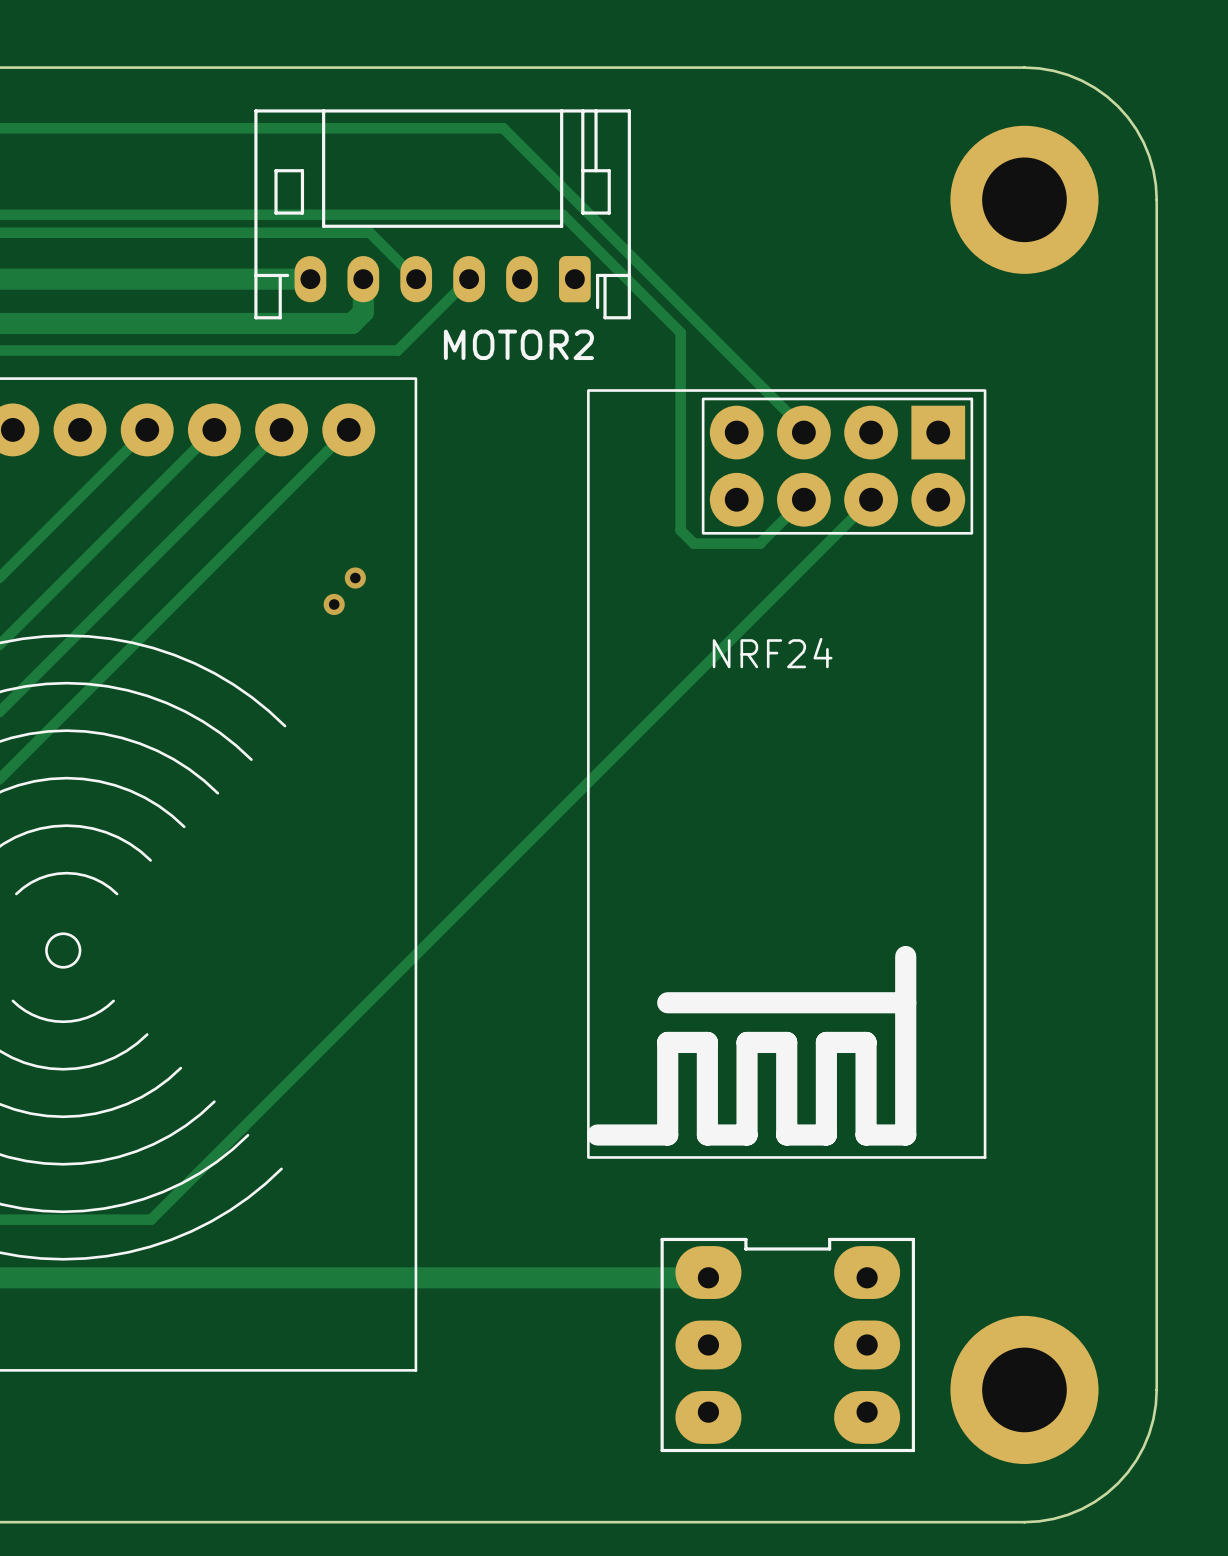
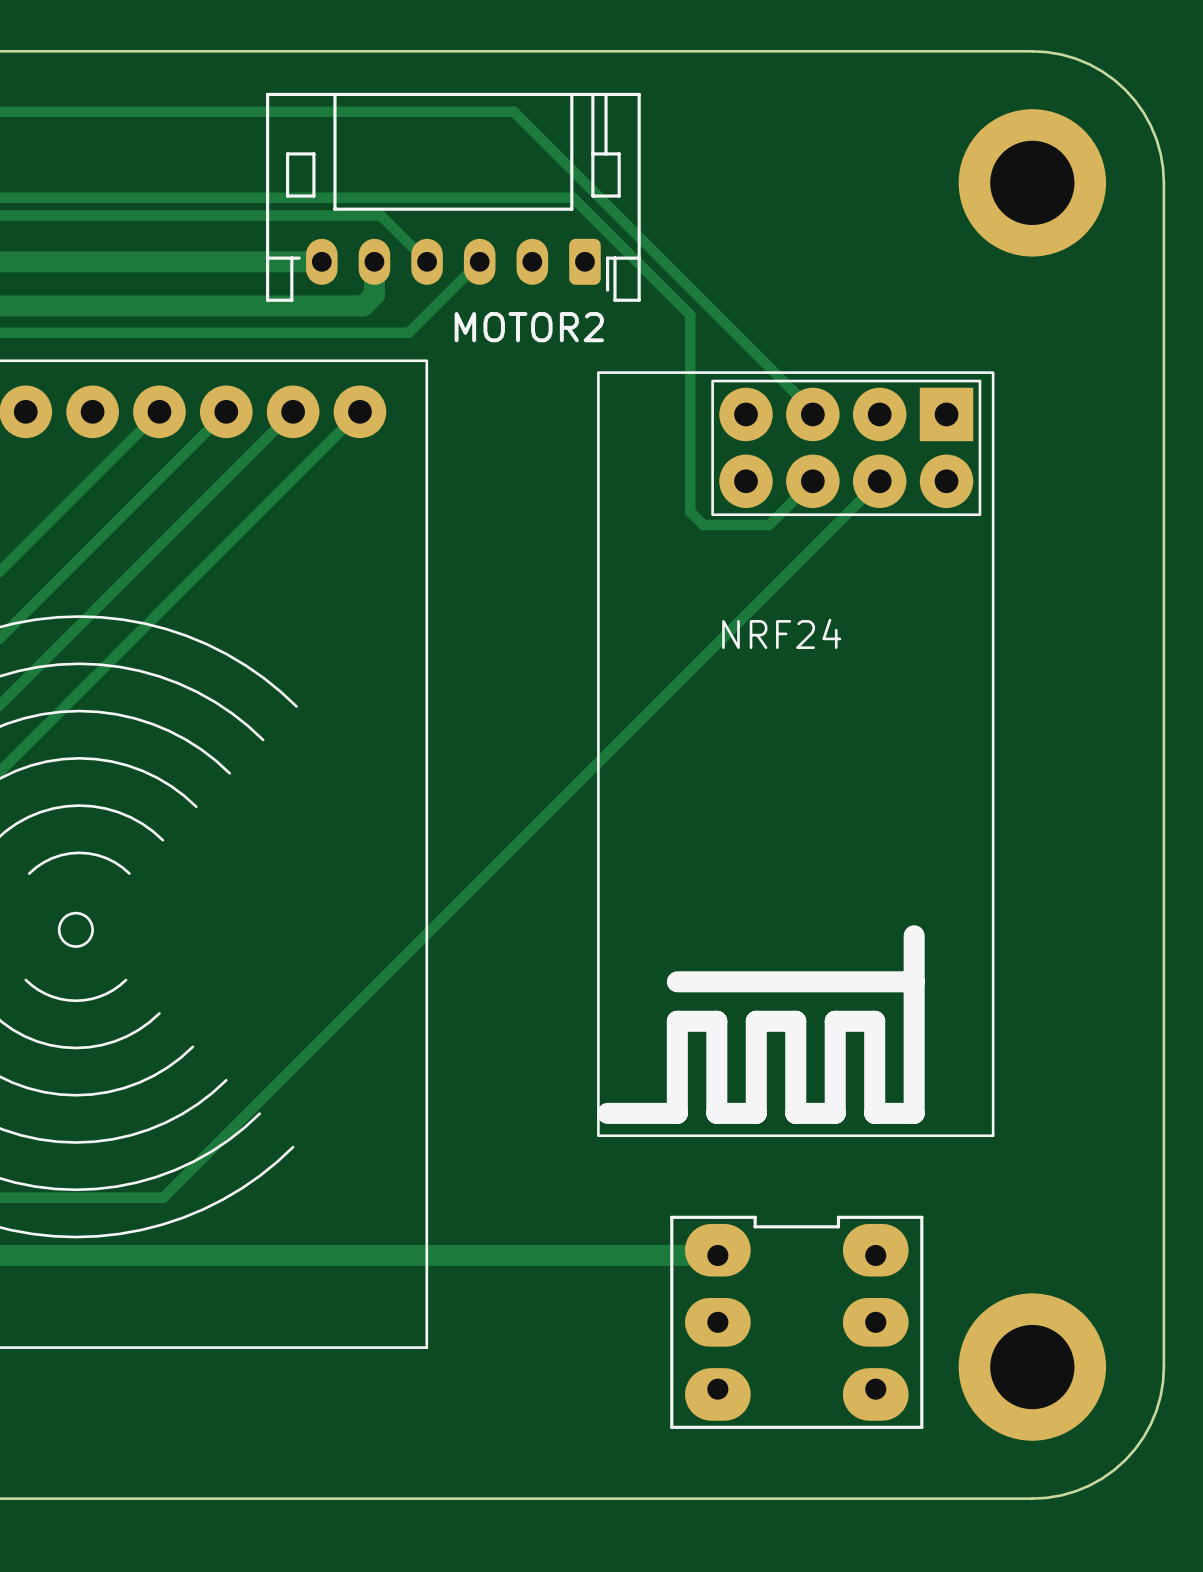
via: (355, 578) -> none
via: (334, 604) -> none

